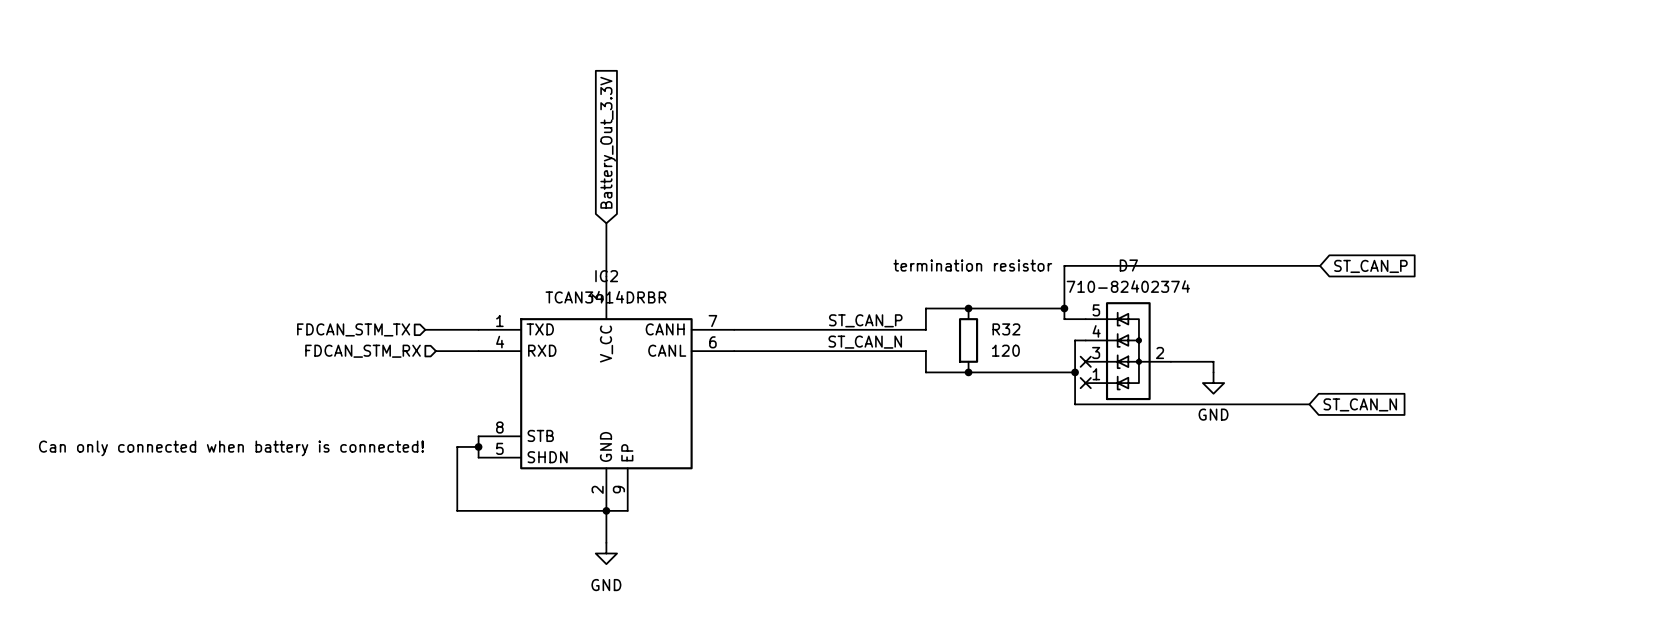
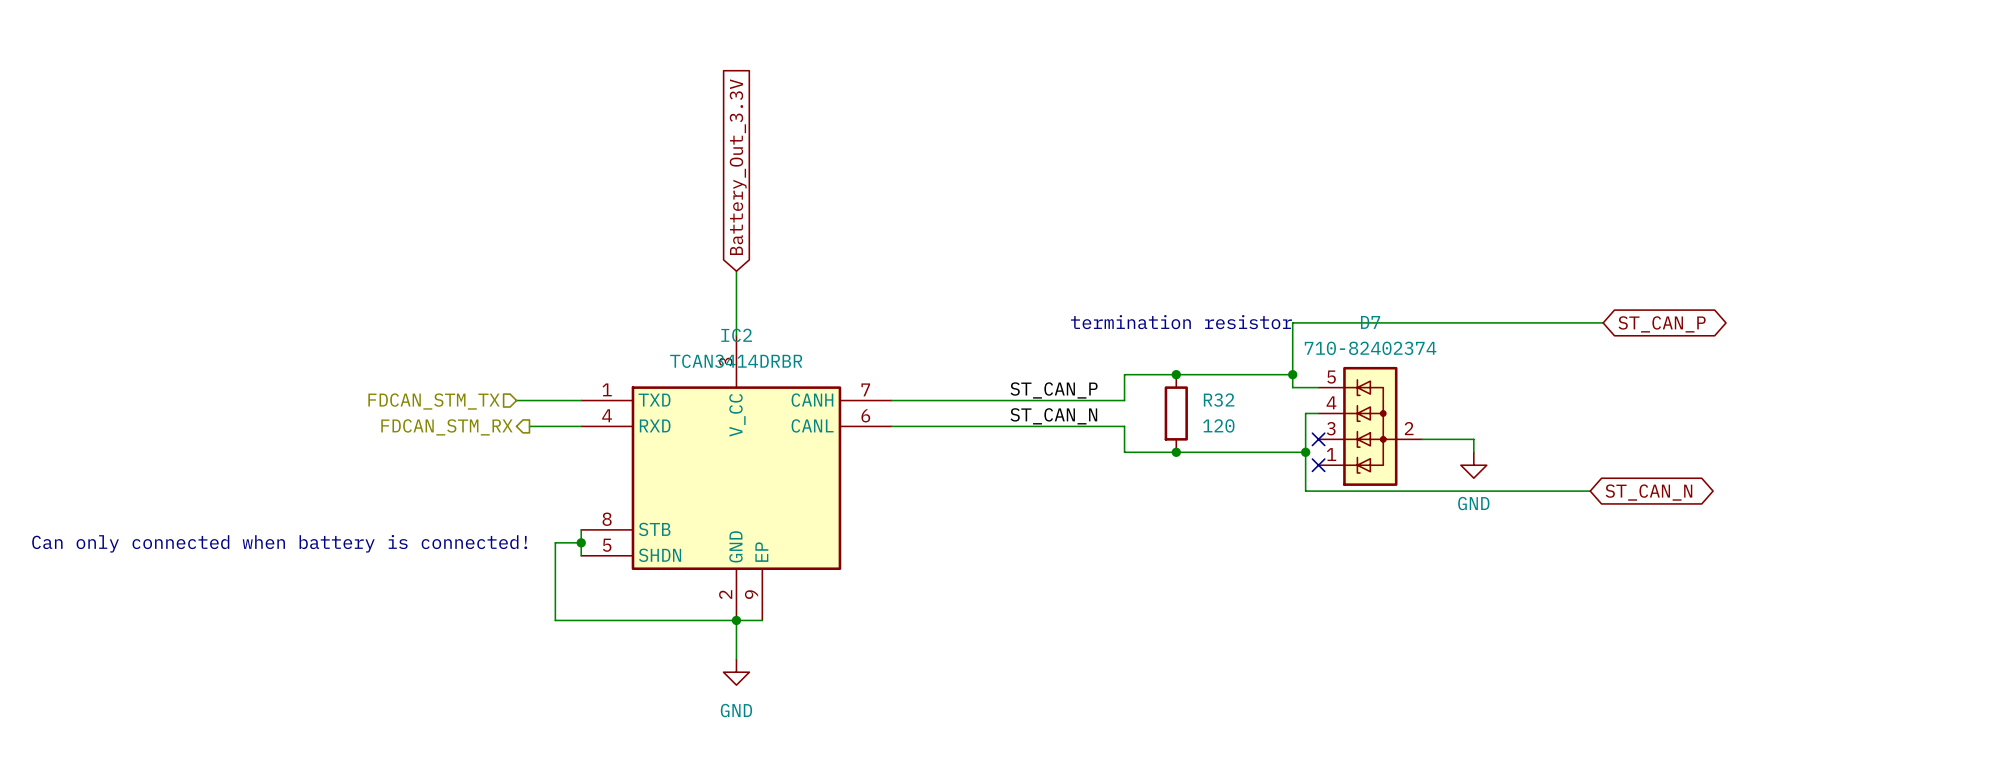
global label shape: input (1370, 266) -> bidirectional (1662, 324)
hierarchical label shape: input (363, 351) -> output (446, 427)
global label shape: input (1360, 404) -> bidirectional (1648, 492)

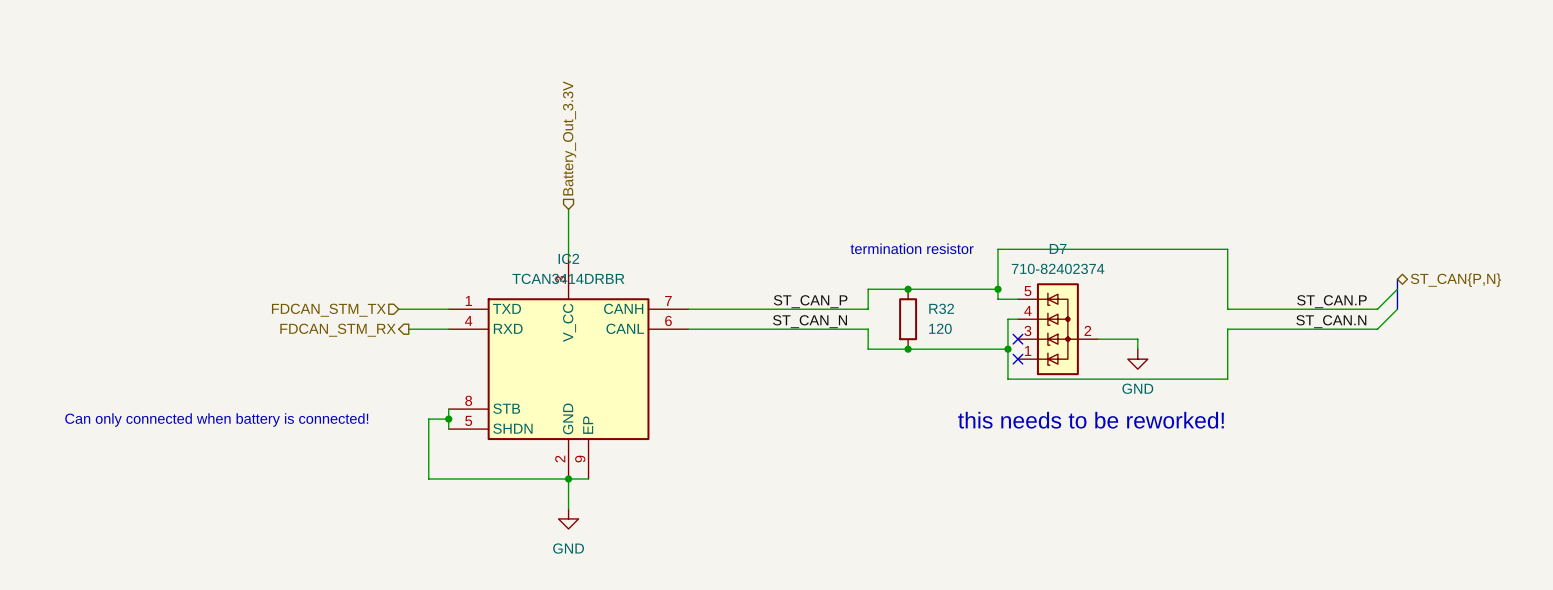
hierarchical label: none -> Battery_Out_3.3V (569, 138)
global label: Battery_Out_3.3V (738, 167) -> none
wire: (1590, 322) (1603, 322) -> (1227, 249) (1227, 309) (1377, 309) (1397, 289)
global label: ST_CAN_P (1662, 324) -> none
bus: none -> (1397, 279) (1397, 309)
hierarchical label: none -> ST_CAN{P,N} (1455, 280)
label: none -> ST_CAN.P (1331, 301)
wire: none -> (1397, 309) (1377, 329) (1227, 329) (1227, 379)
label: none -> ST_CAN.N (1331, 321)
global label: ST_CAN_N (1648, 492) -> none
text: none -> this needs to be reworked! (1091, 420)

